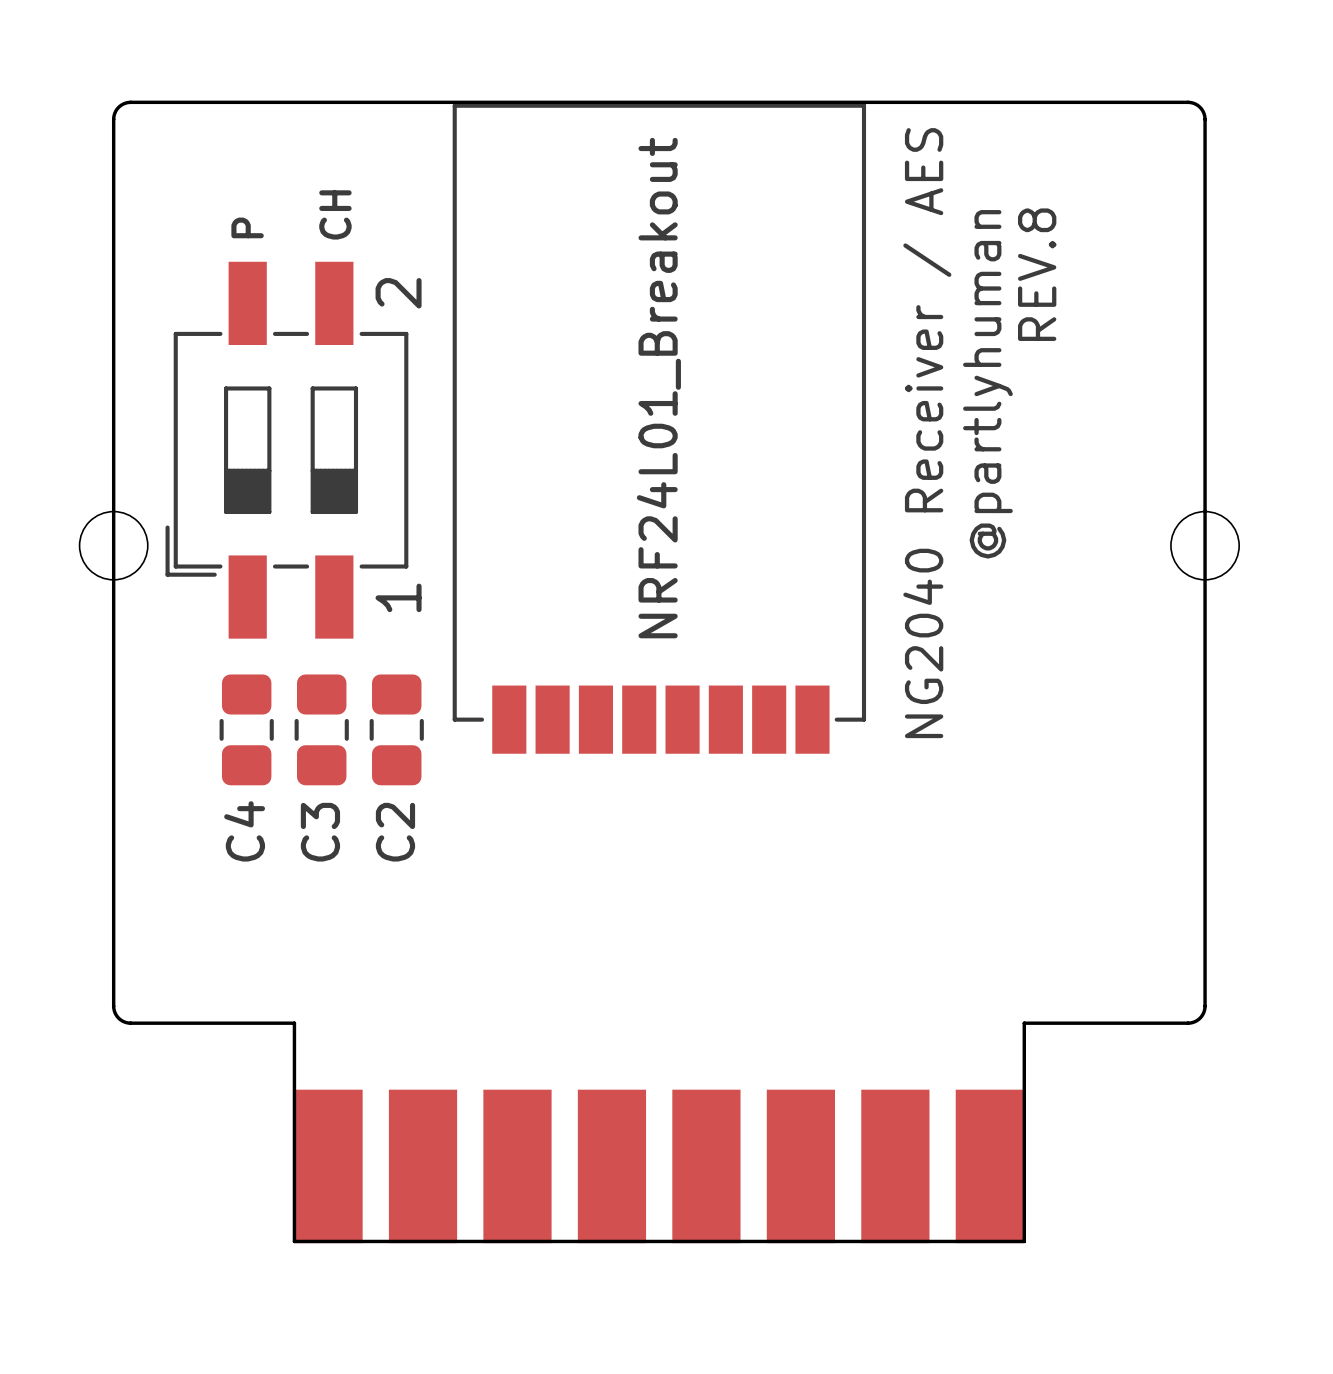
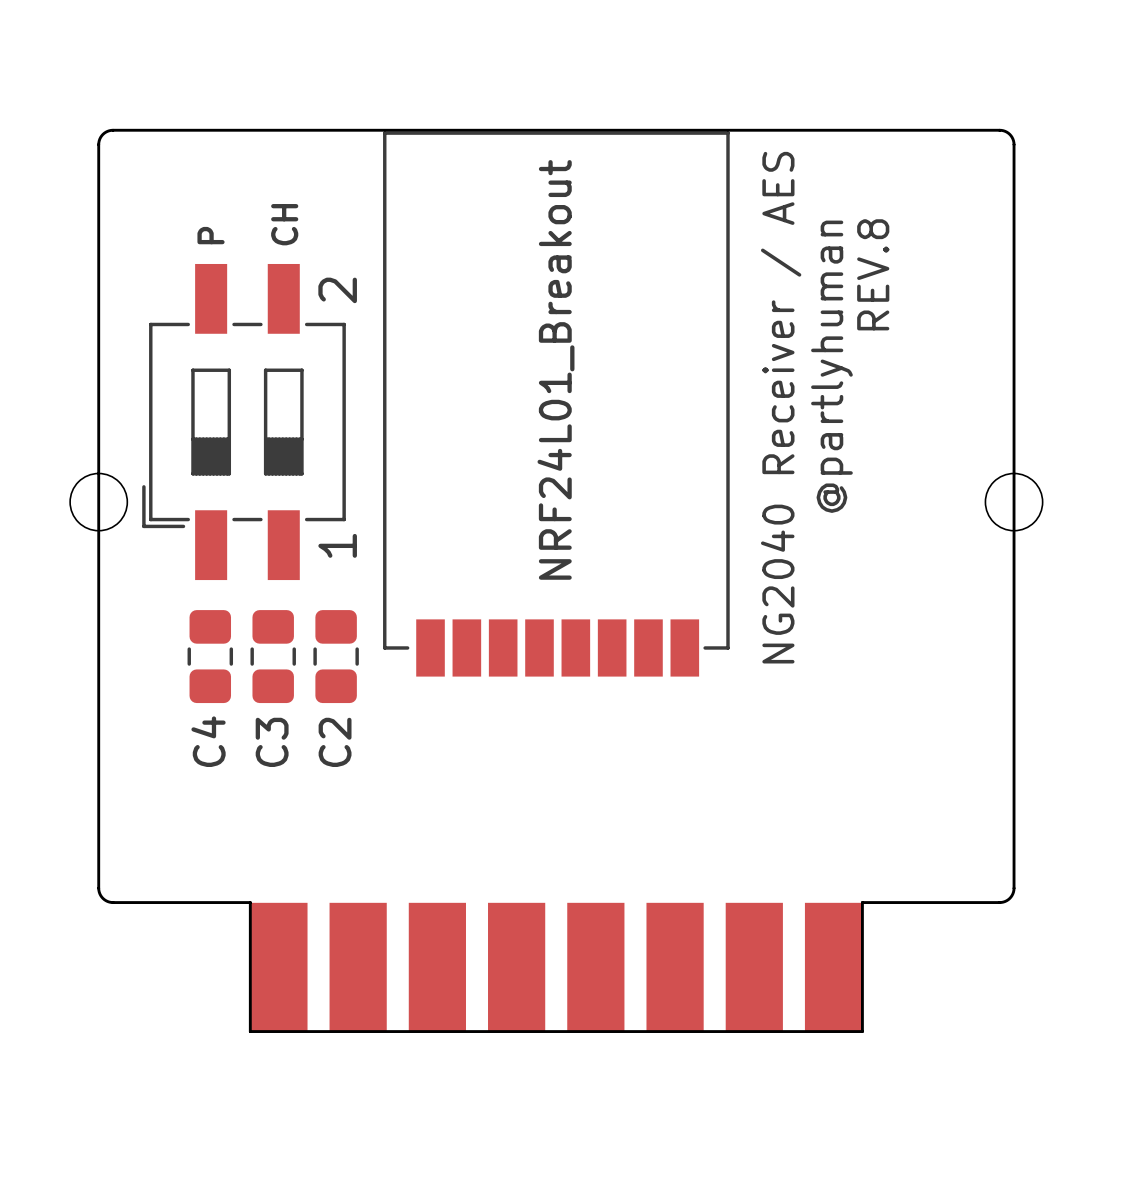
part position: (659, 1166) -> (556, 967)
board edge: (294, 1177) (294, 1241) (1024, 1241) (1024, 1177) -> (250, 1031) (862, 1031)

